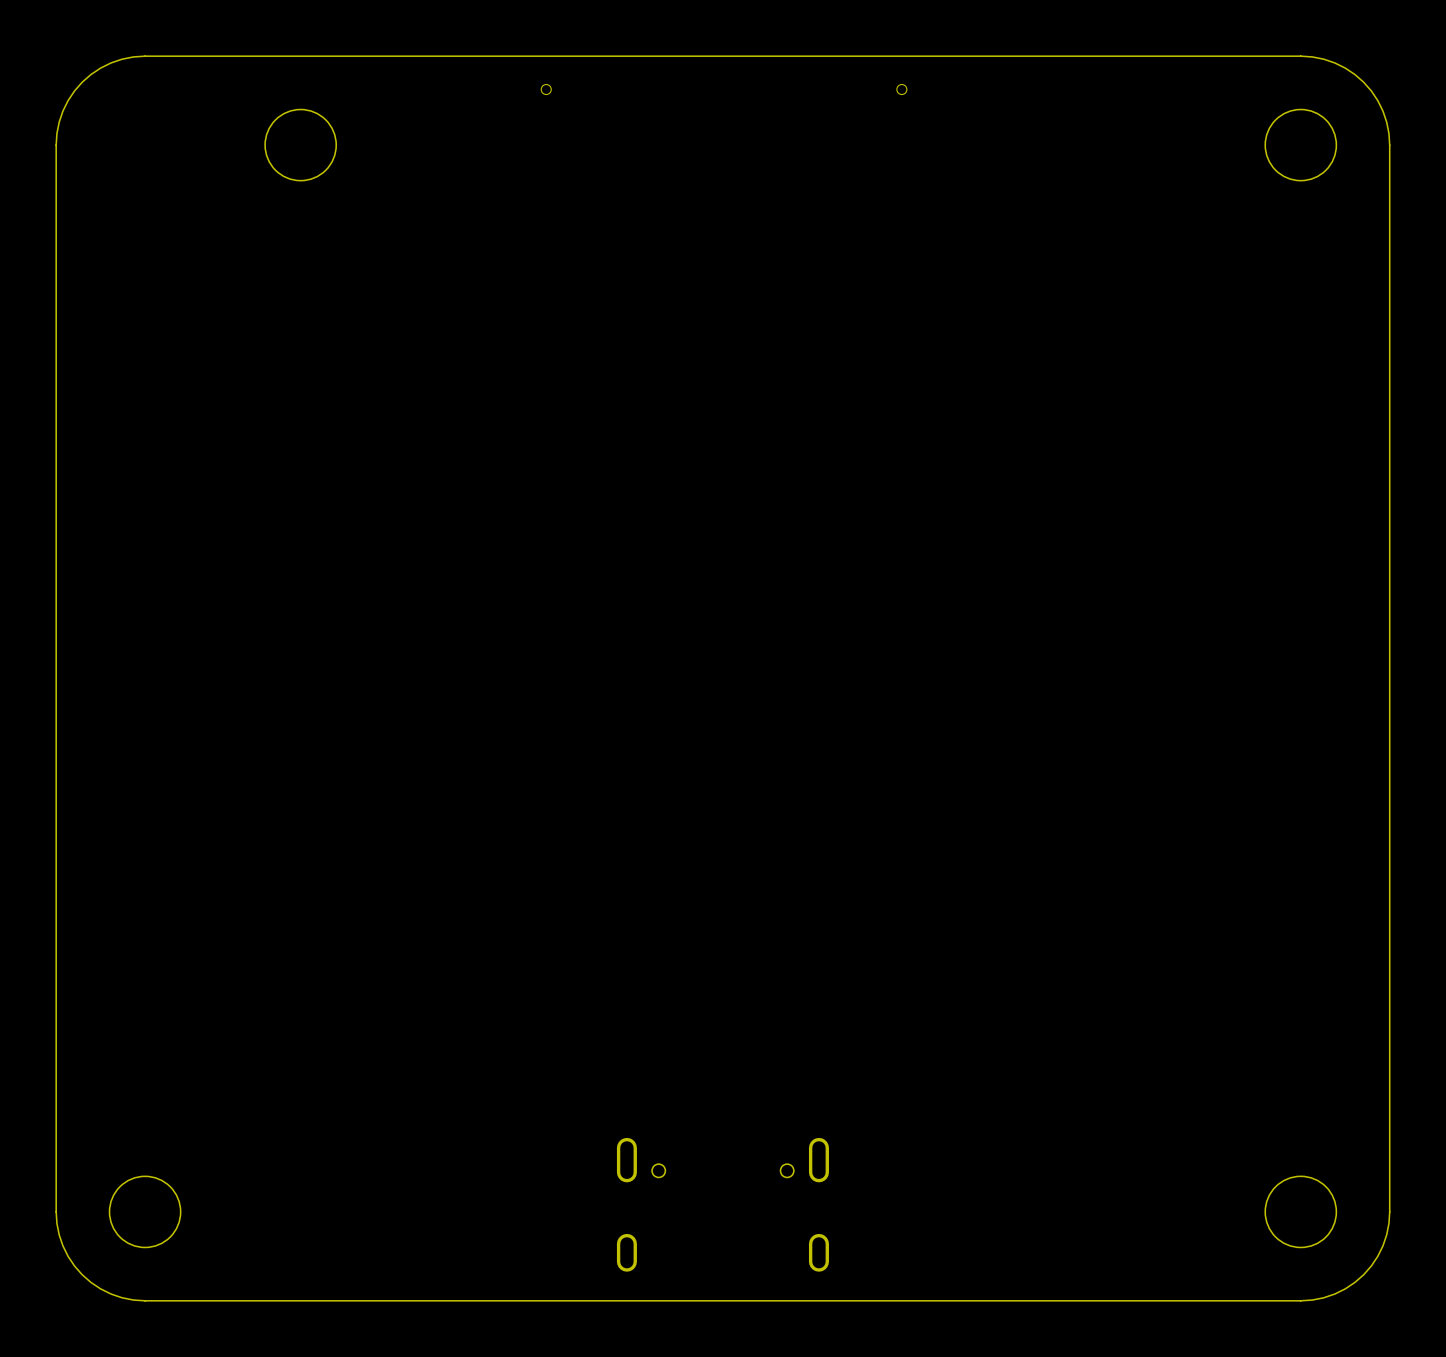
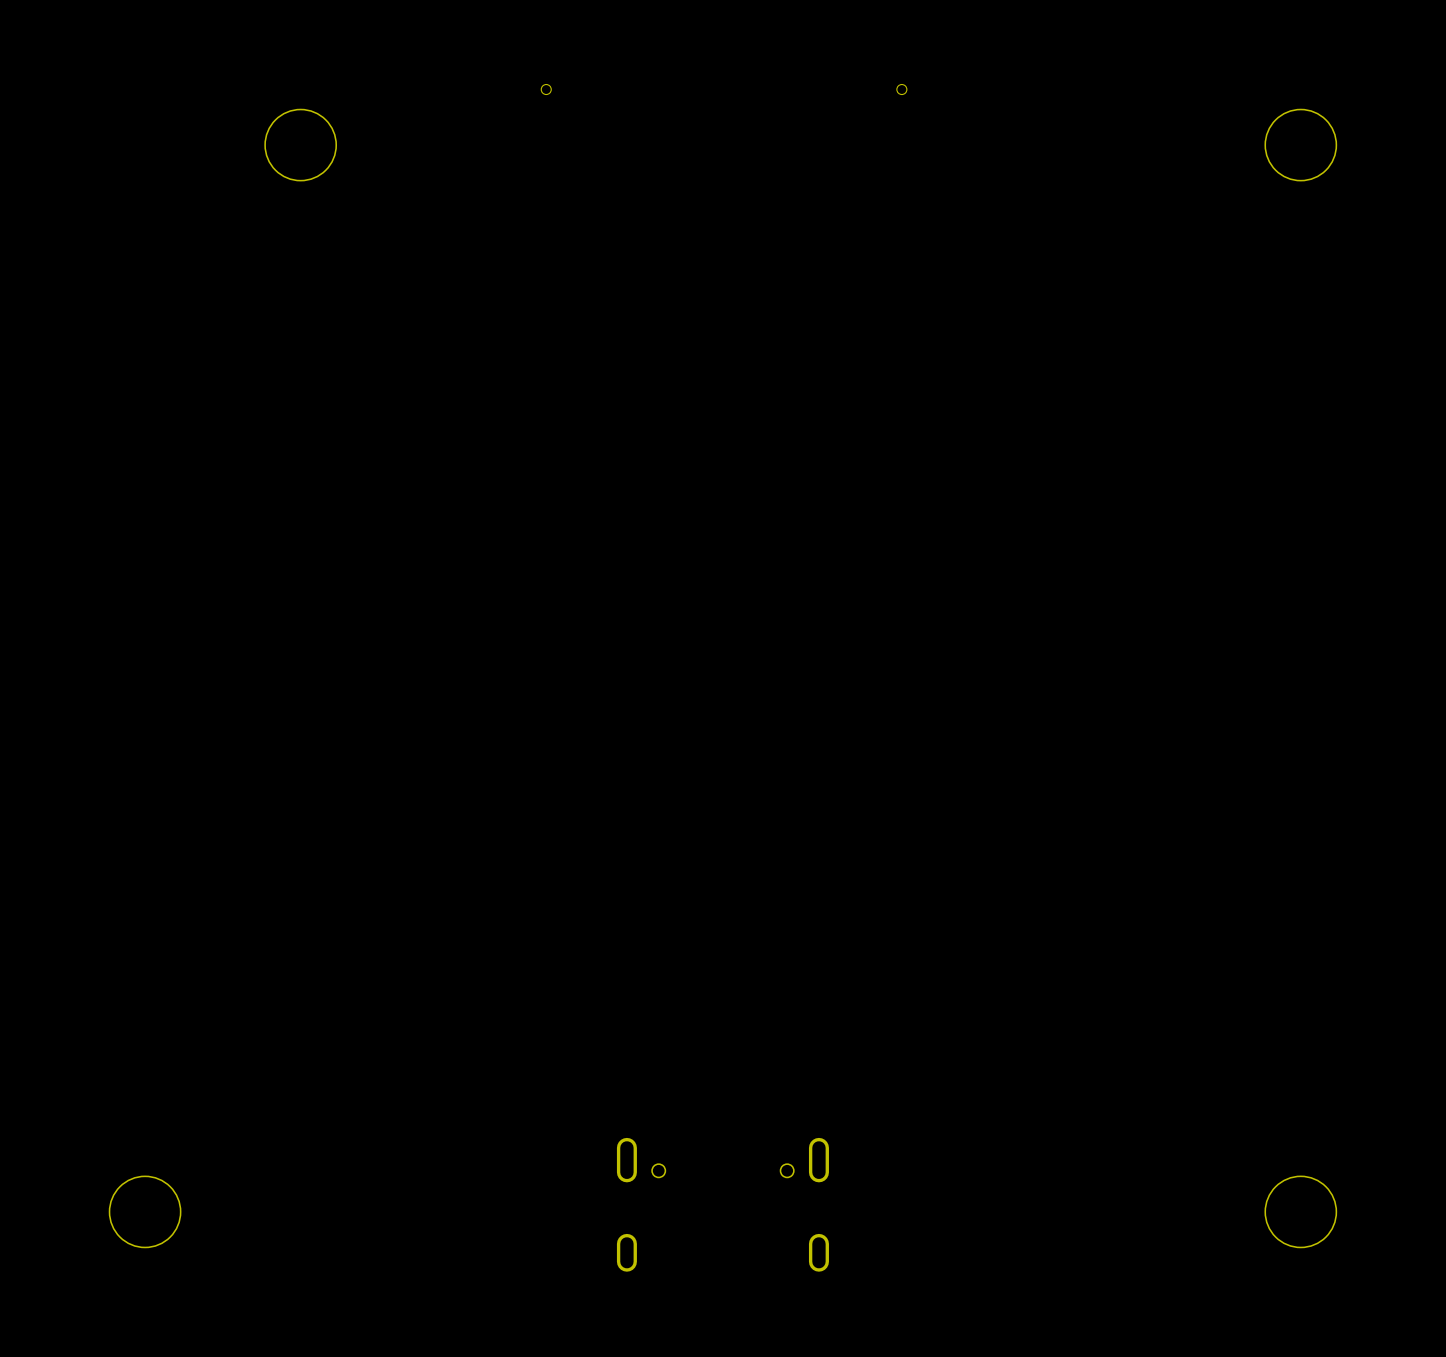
board edge: (1300, 56) (145, 56) (133, 56) (111, 62) (90, 74) (82, 82) (68, 100) (62, 111) (59, 122) (56, 145) (56, 1211) (59, 1234) (62, 1245) (68, 1256) (82, 1274) (90, 1282) (111, 1294) (122, 1297) (145, 1300) (1300, 1300) (1323, 1297) (1334, 1294) (1354, 1282) (1363, 1274) (1371, 1266) (1382, 1245) (1386, 1234) (1389, 1211) (1389, 145) (1386, 122) (1382, 111) (1371, 90) (1363, 82) (1345, 68) (1334, 62) (1312, 56) (1300, 56) -> none

